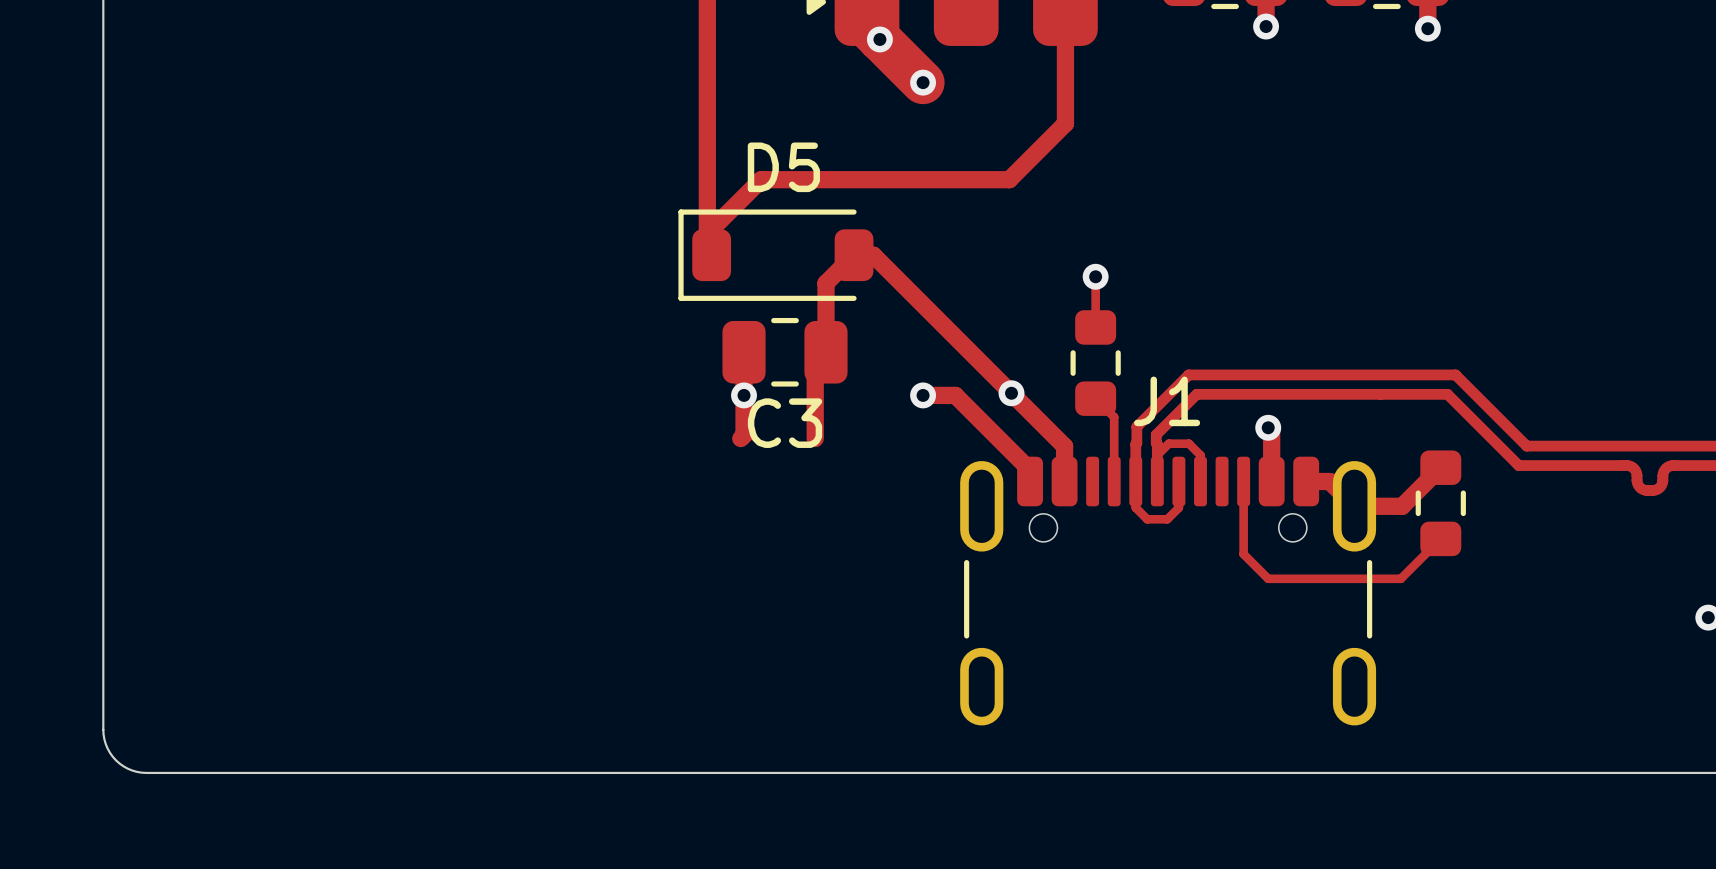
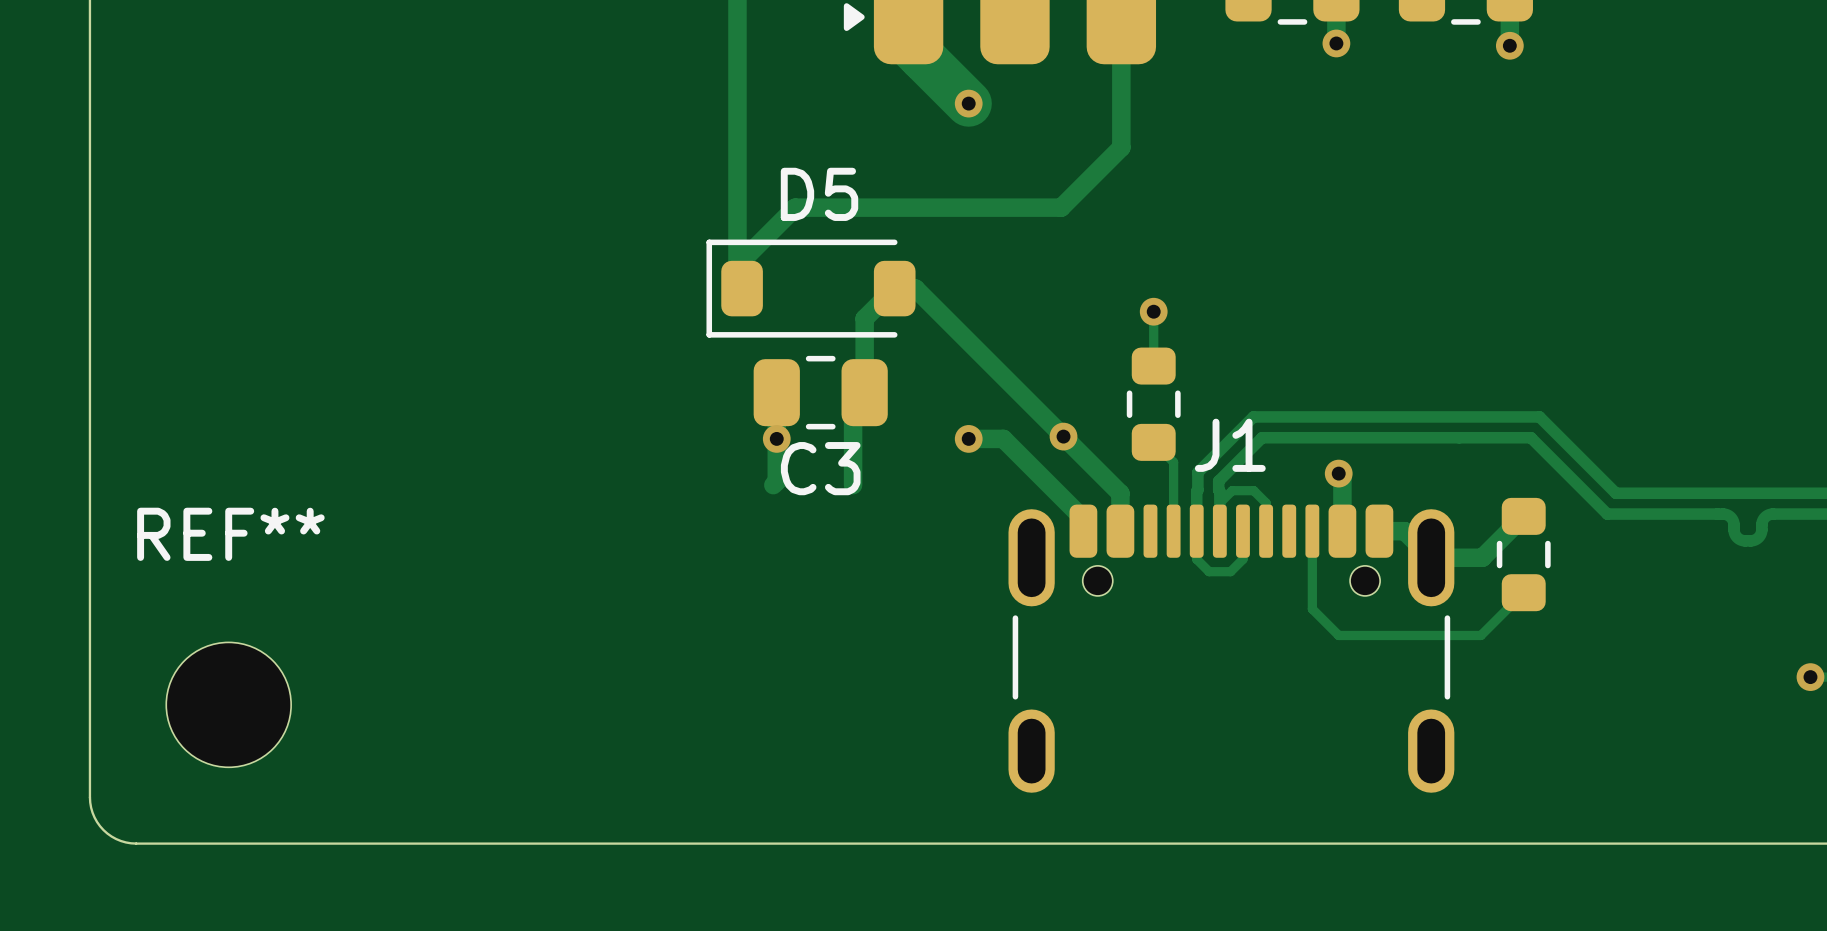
via: (879, 39) -> none
REF**: none -> (228, 704)

